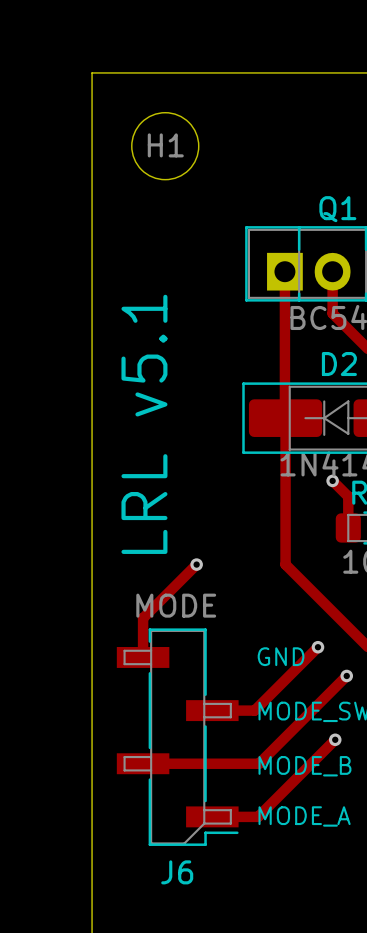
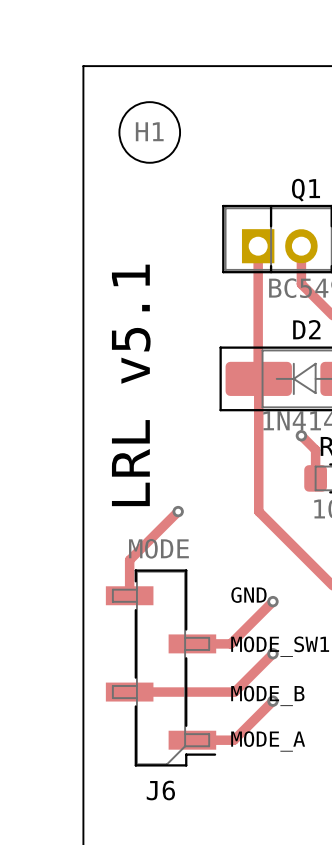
track: (317, 647) (301, 663) -> none
via: (317, 647) -> none
via: none -> (272, 601)
track: (346, 675) (301, 721) -> none
via: (346, 675) -> none
via: none -> (272, 653)
track: (335, 739) (301, 773) -> none
via: (335, 739) -> none
via: none -> (272, 701)

